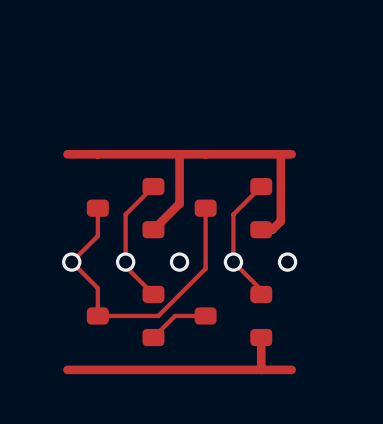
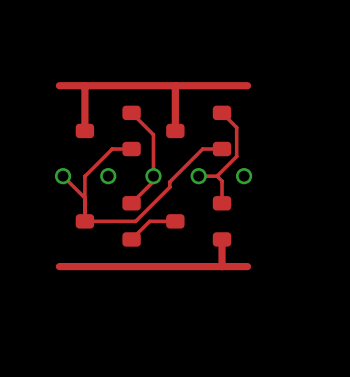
top track: (179, 154) (179, 203) (153, 229) -> none
top track: none -> (175, 85) (175, 130)
top track: (280, 154) (280, 221) (272, 229) (261, 229) -> none
top track: (153, 186) (125, 214) (125, 266) (153, 294) -> (131, 112) (153, 134) (153, 181) (131, 203)
top track: (261, 186) (233, 214) (233, 262) (261, 289) -> (222, 112) (236, 127) (236, 156) (217, 176)
top track: (97, 208) (97, 235) (71, 262) -> (84, 130) (84, 85)
top track: (205, 208) (205, 268) (198, 275) -> (222, 149) (202, 149) (169, 181) (169, 187)
top track: none -> (131, 152) (131, 149) (112, 149) (84, 176) (84, 198)
top track: none -> (217, 176) (198, 176)
top track: none -> (217, 176) (222, 181) (222, 199)

